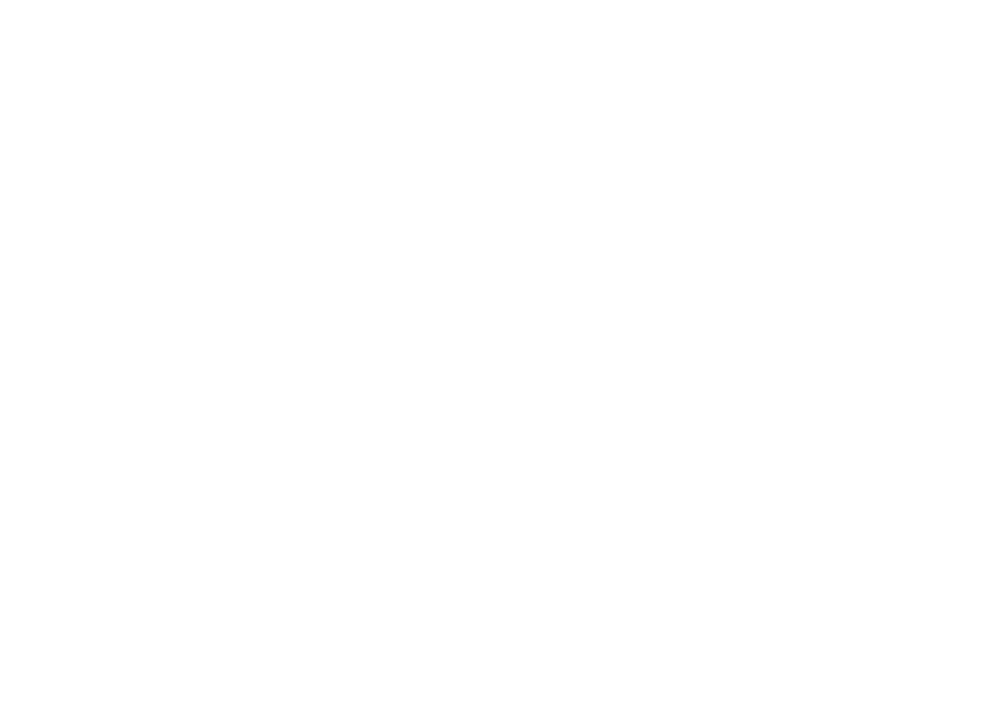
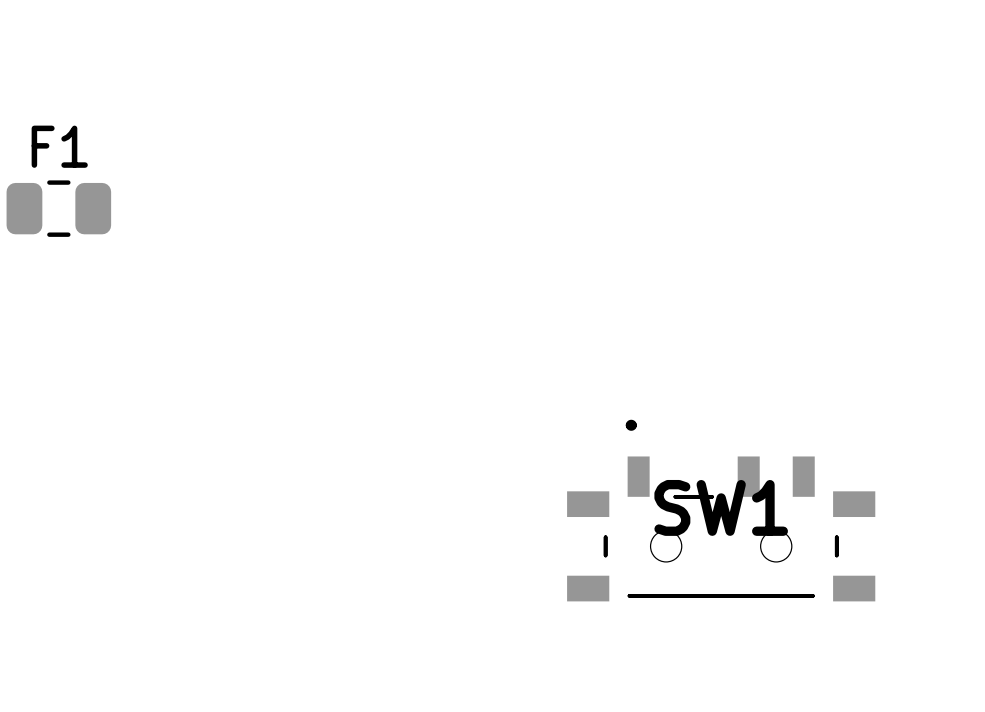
F1: none -> (58, 208)
SW1: none -> (721, 510)

